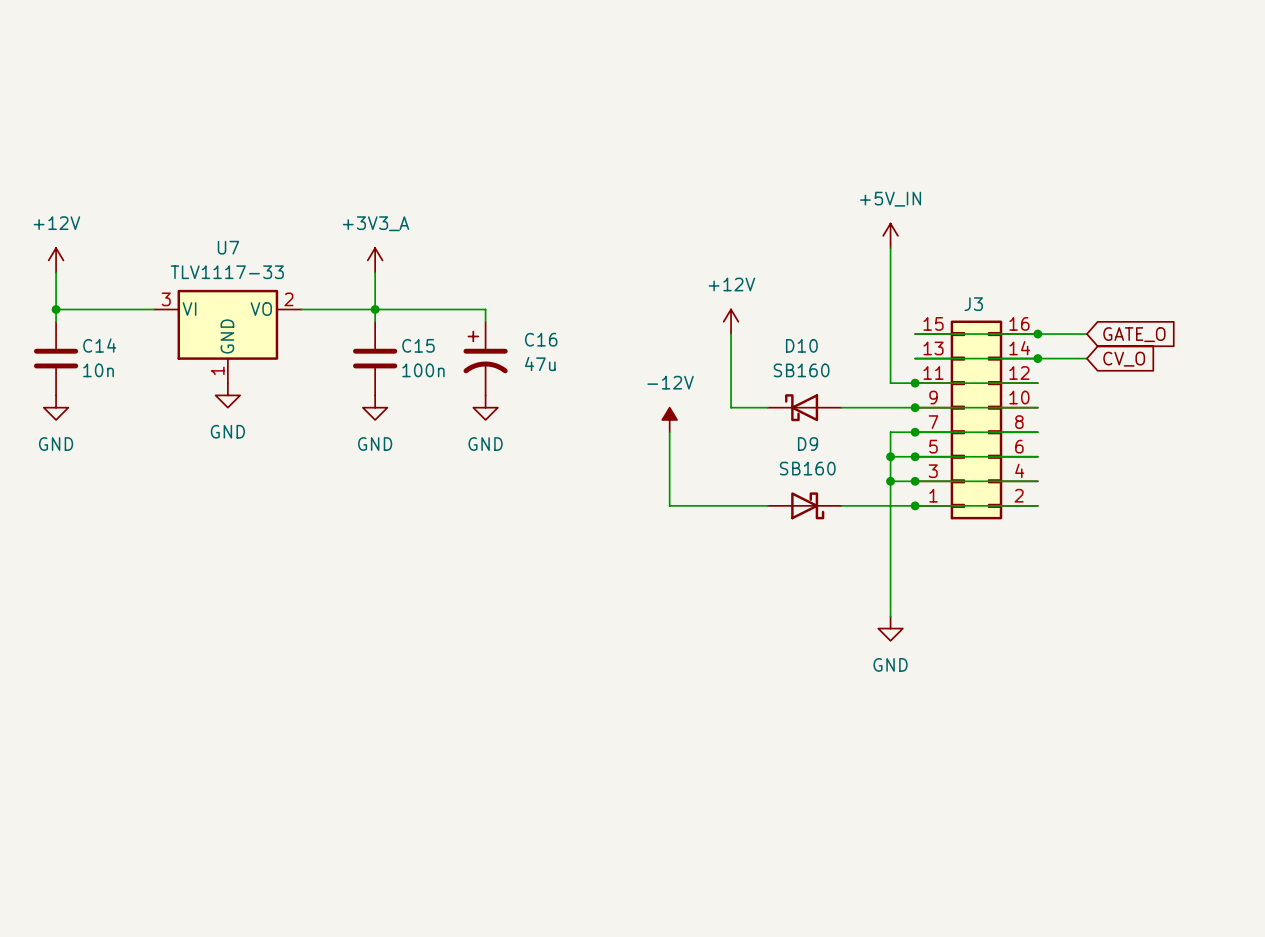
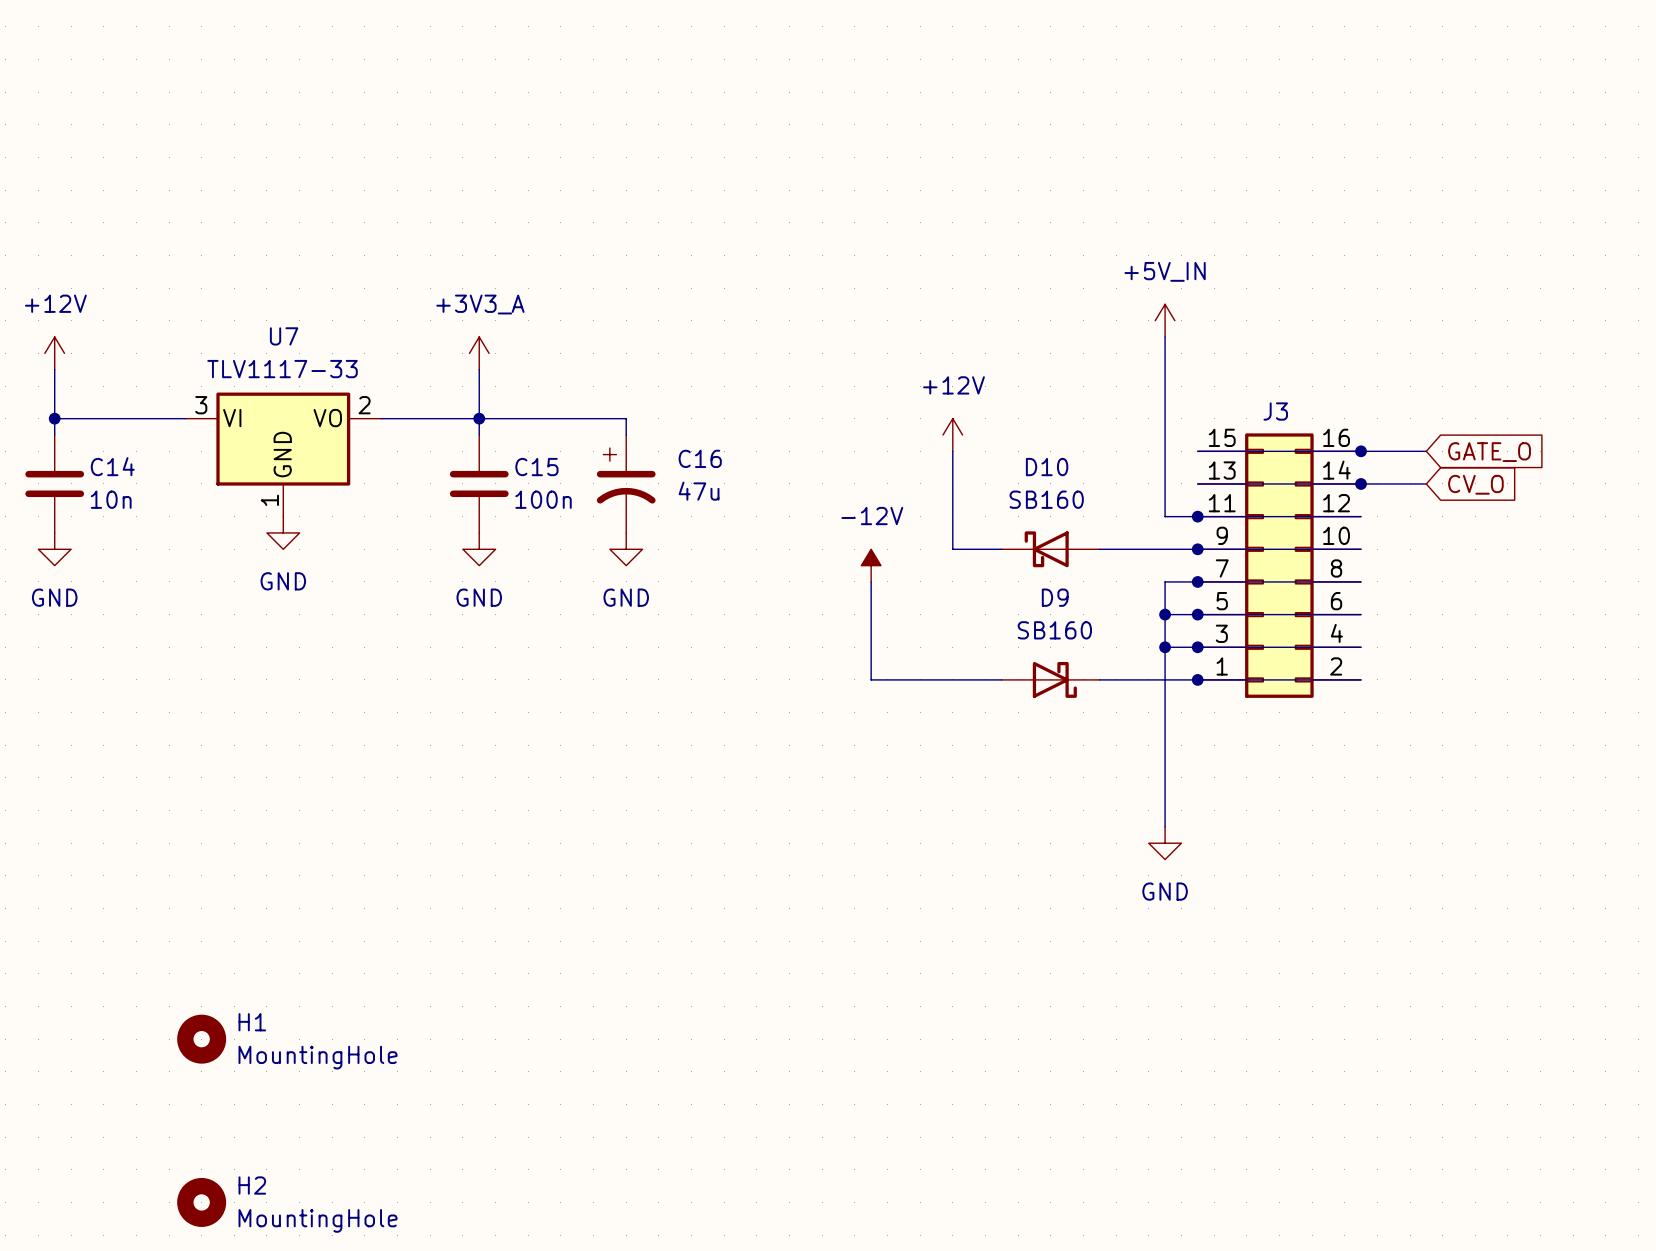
H1: none -> MountingHole (201, 1039)
H2: none -> MountingHole (201, 1202)

